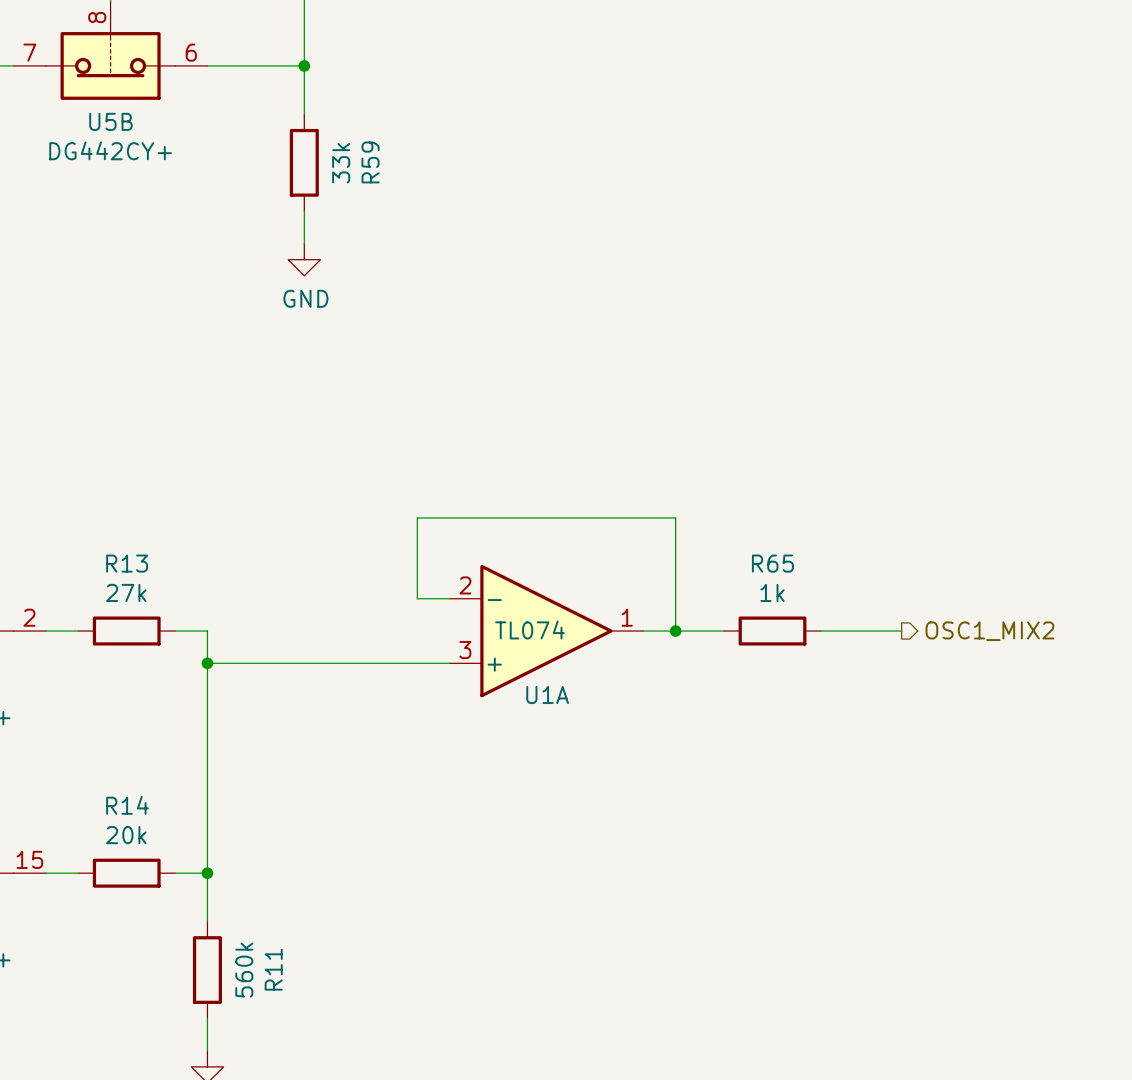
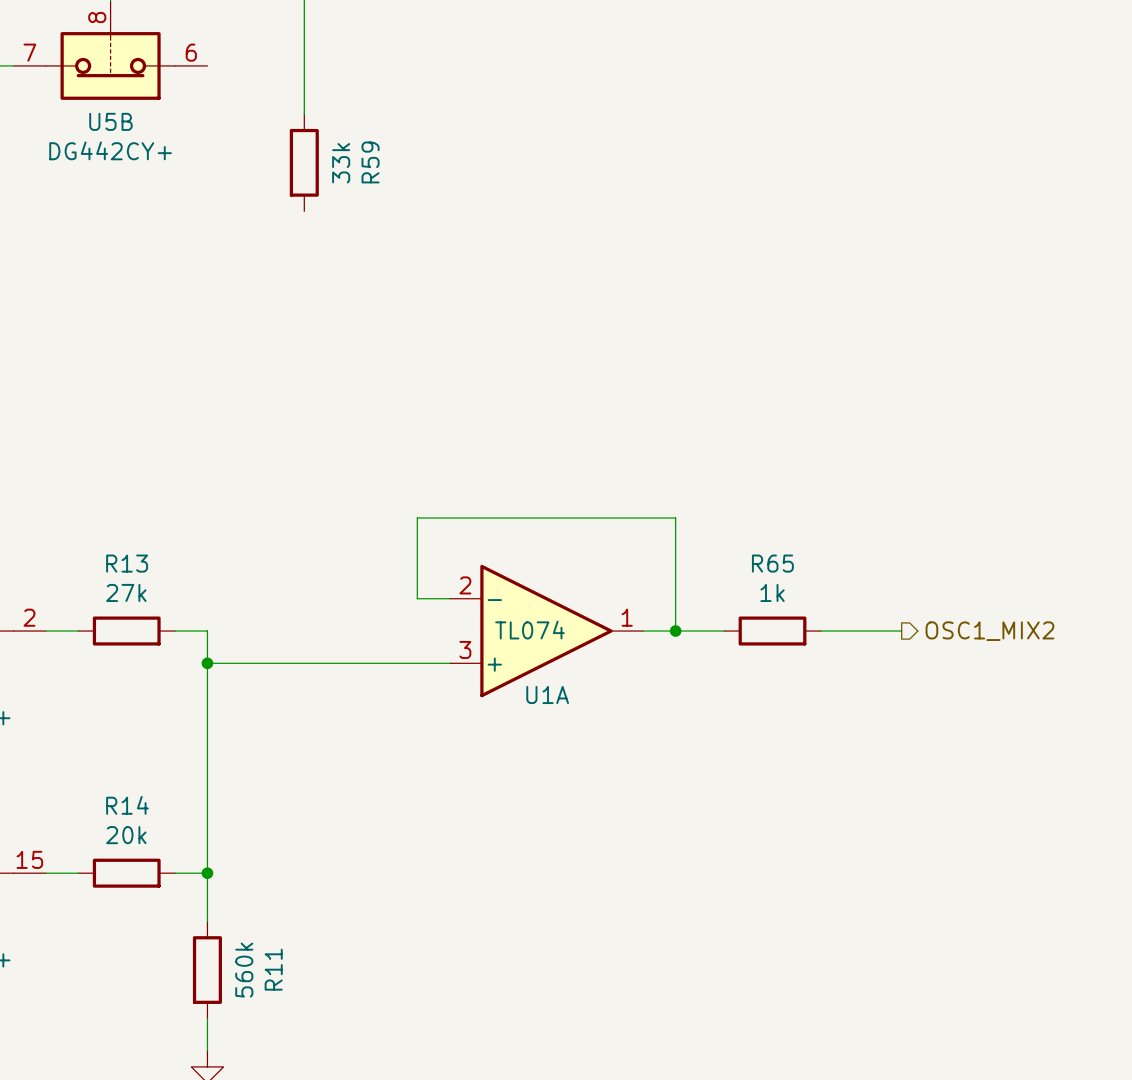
wire: (207, 65) (304, 65) -> none
junction: (304, 65) -> none
wire: (304, 211) (304, 243) -> none
power symbol: GND (304, 259) -> none

